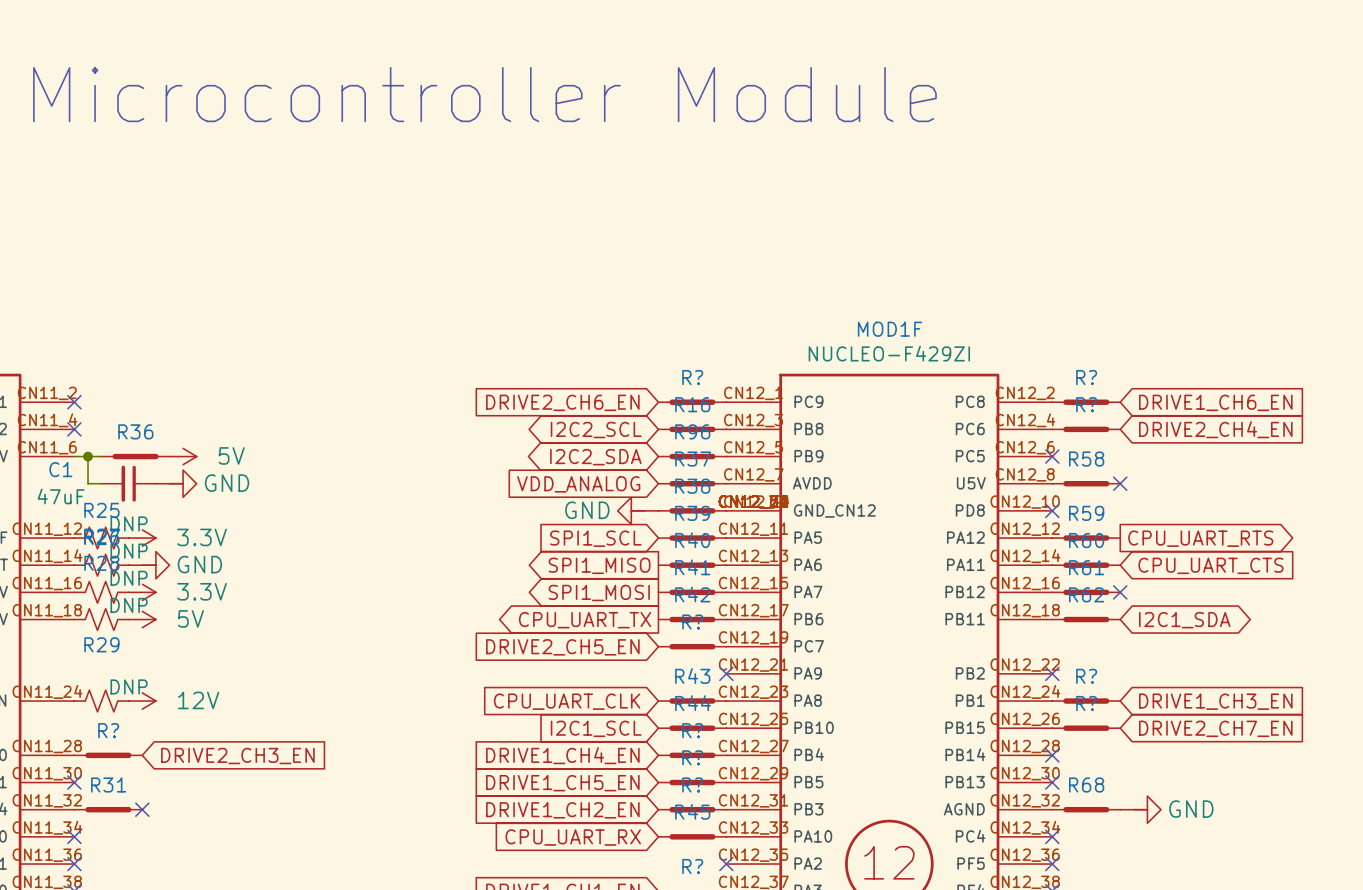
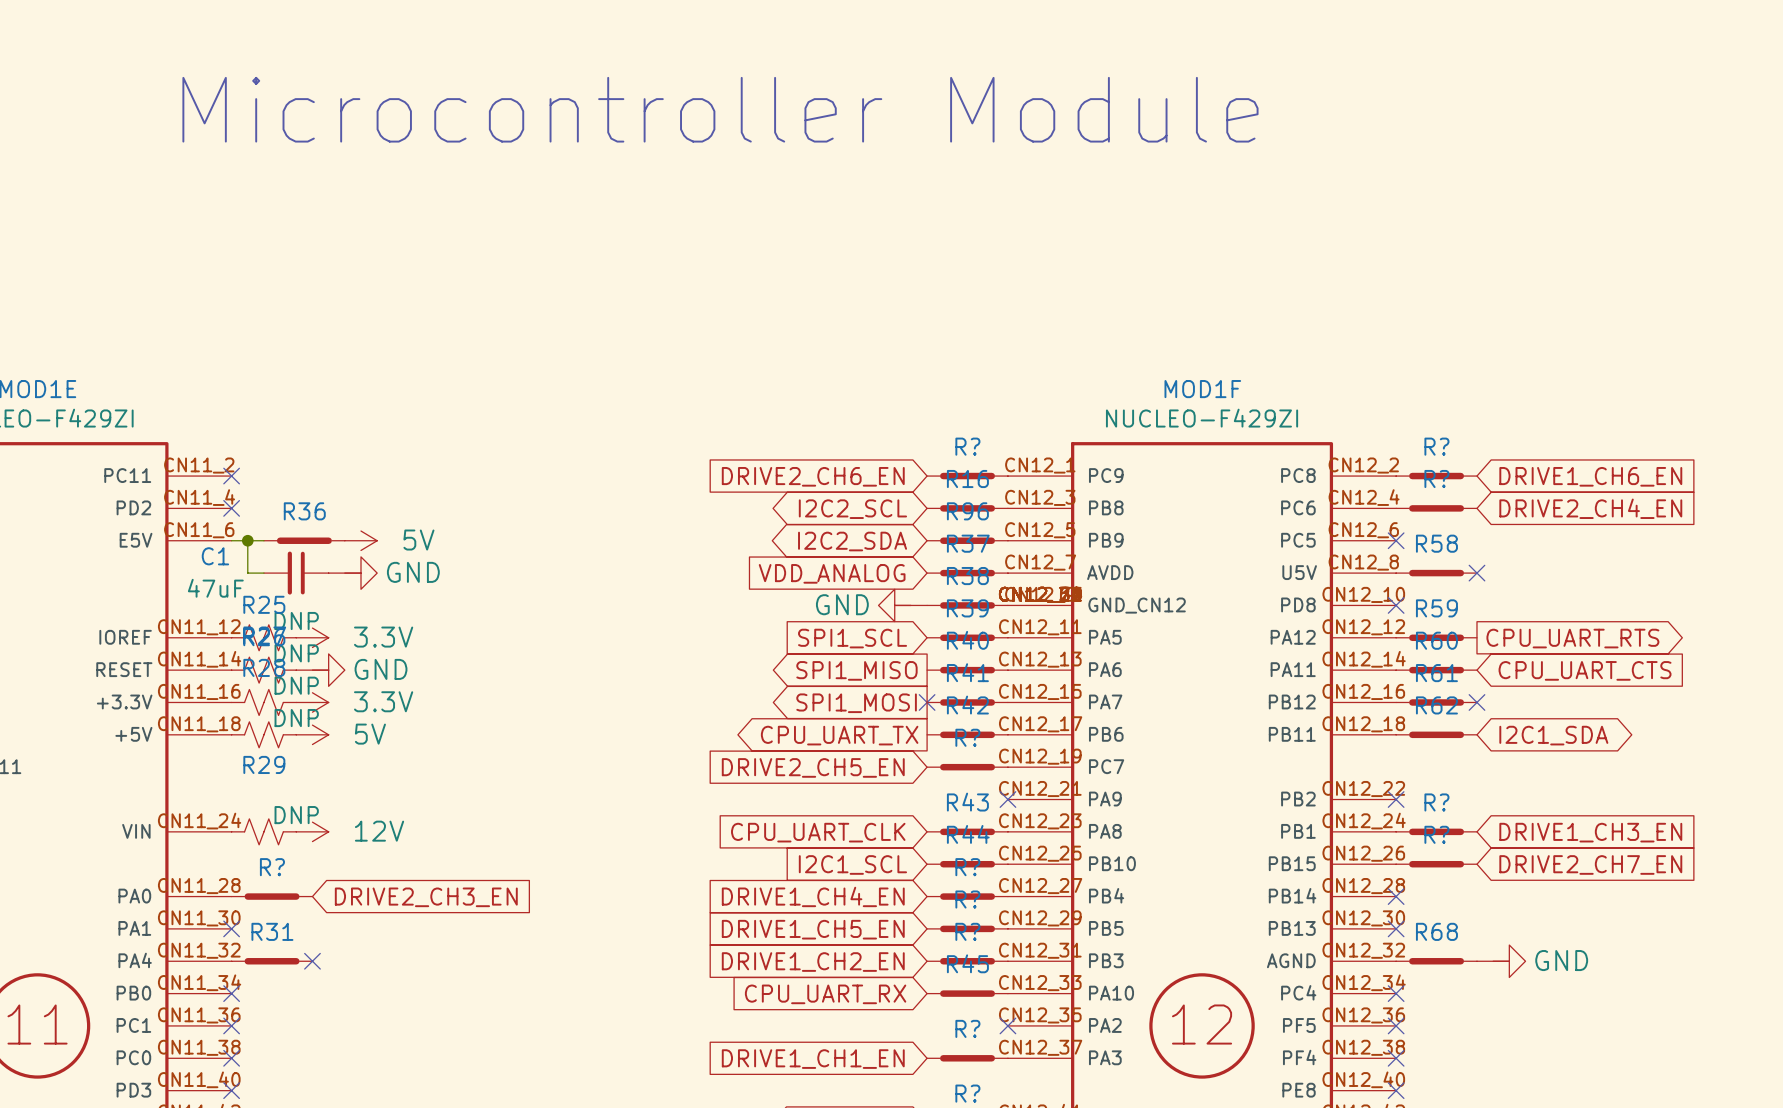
no-connect mark: none -> (927, 702)

